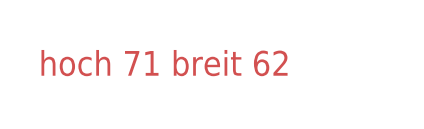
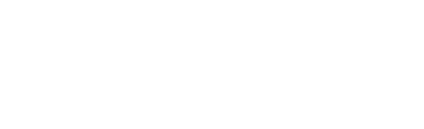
text: hoch 71 breit 62 (164, 63) -> none

